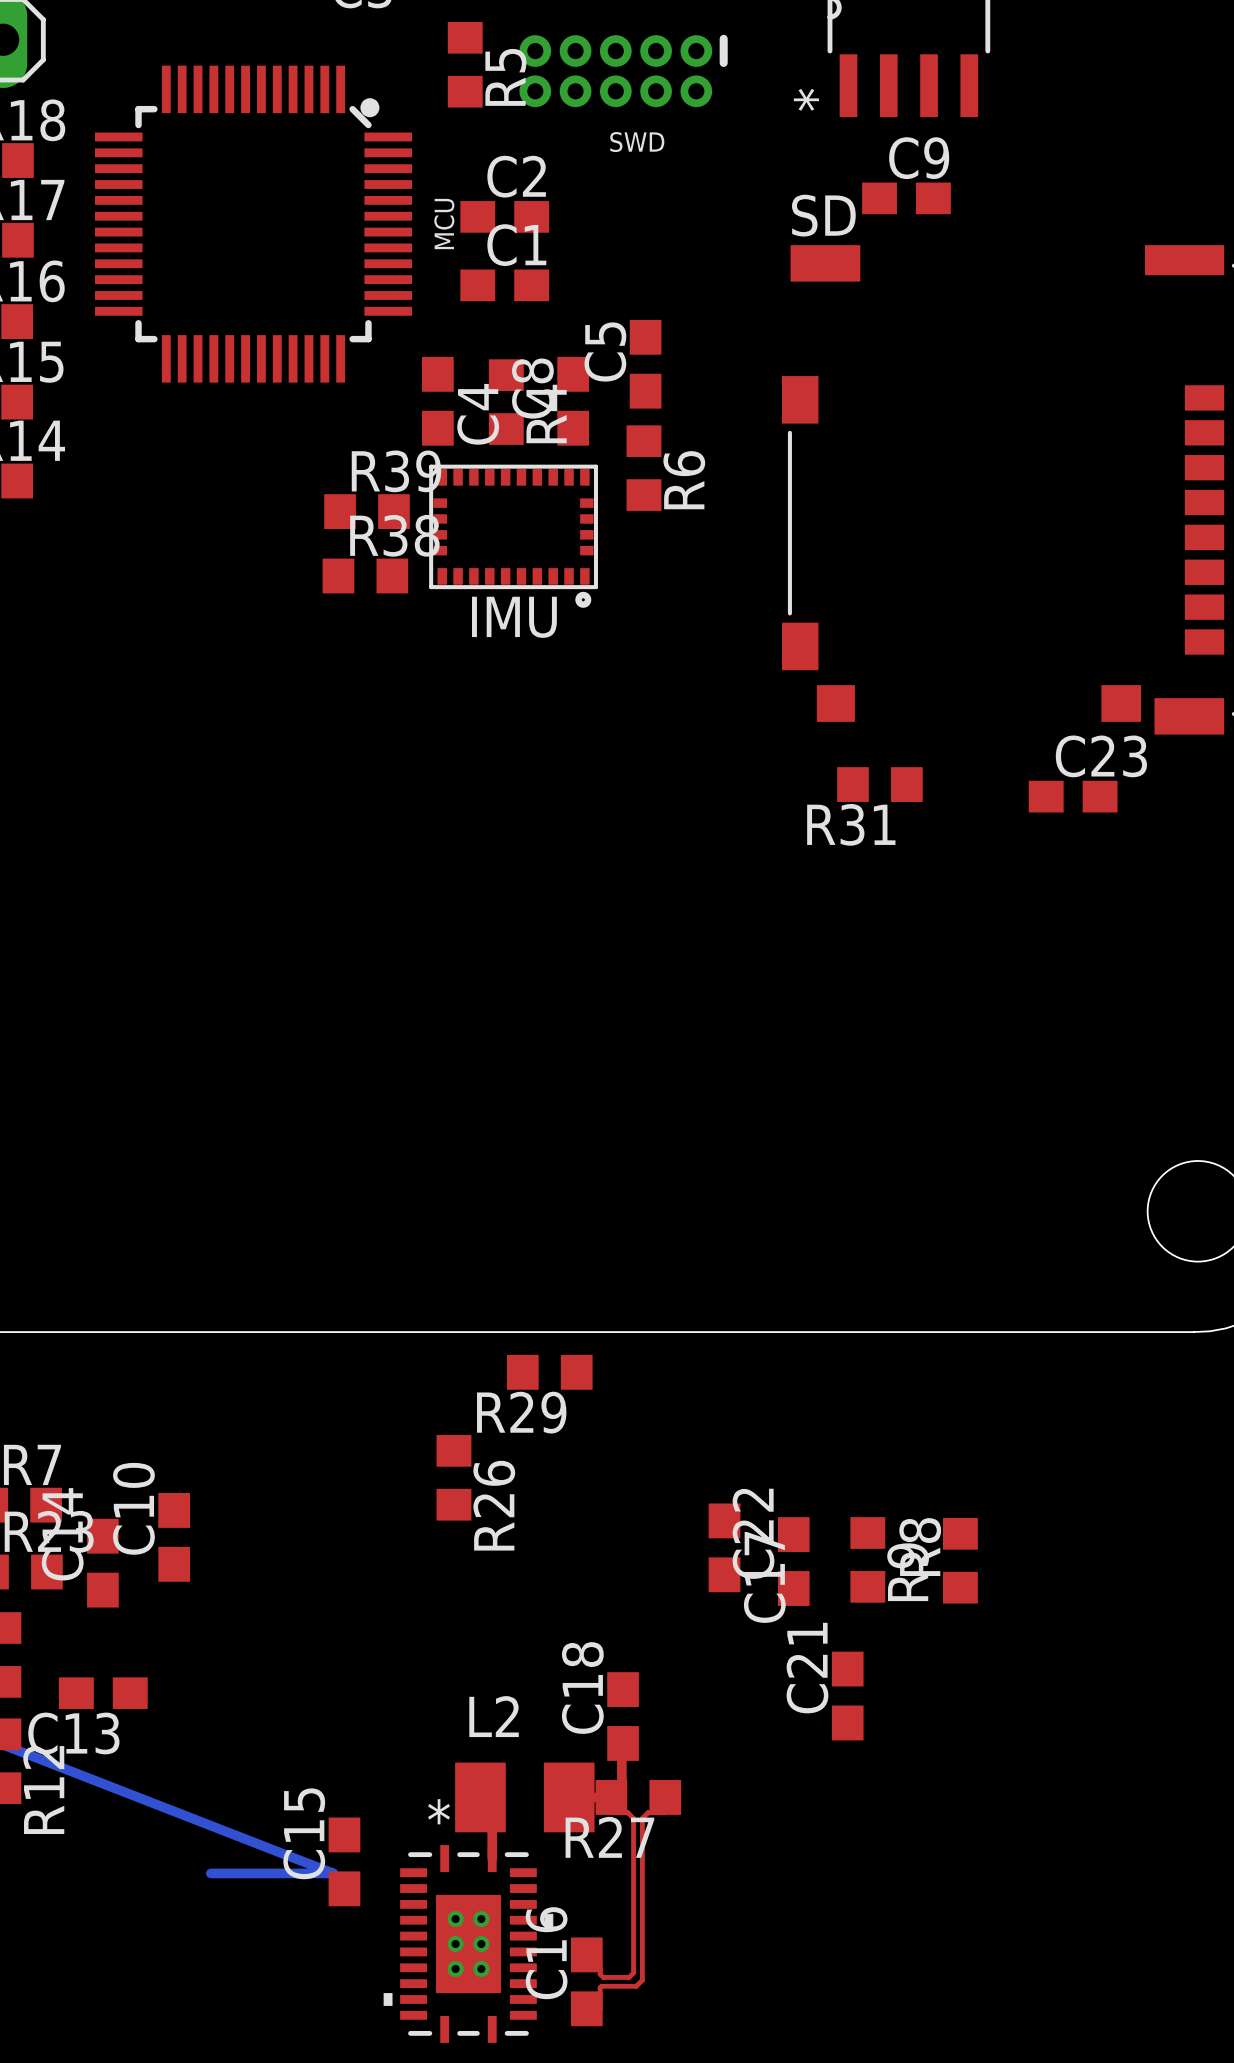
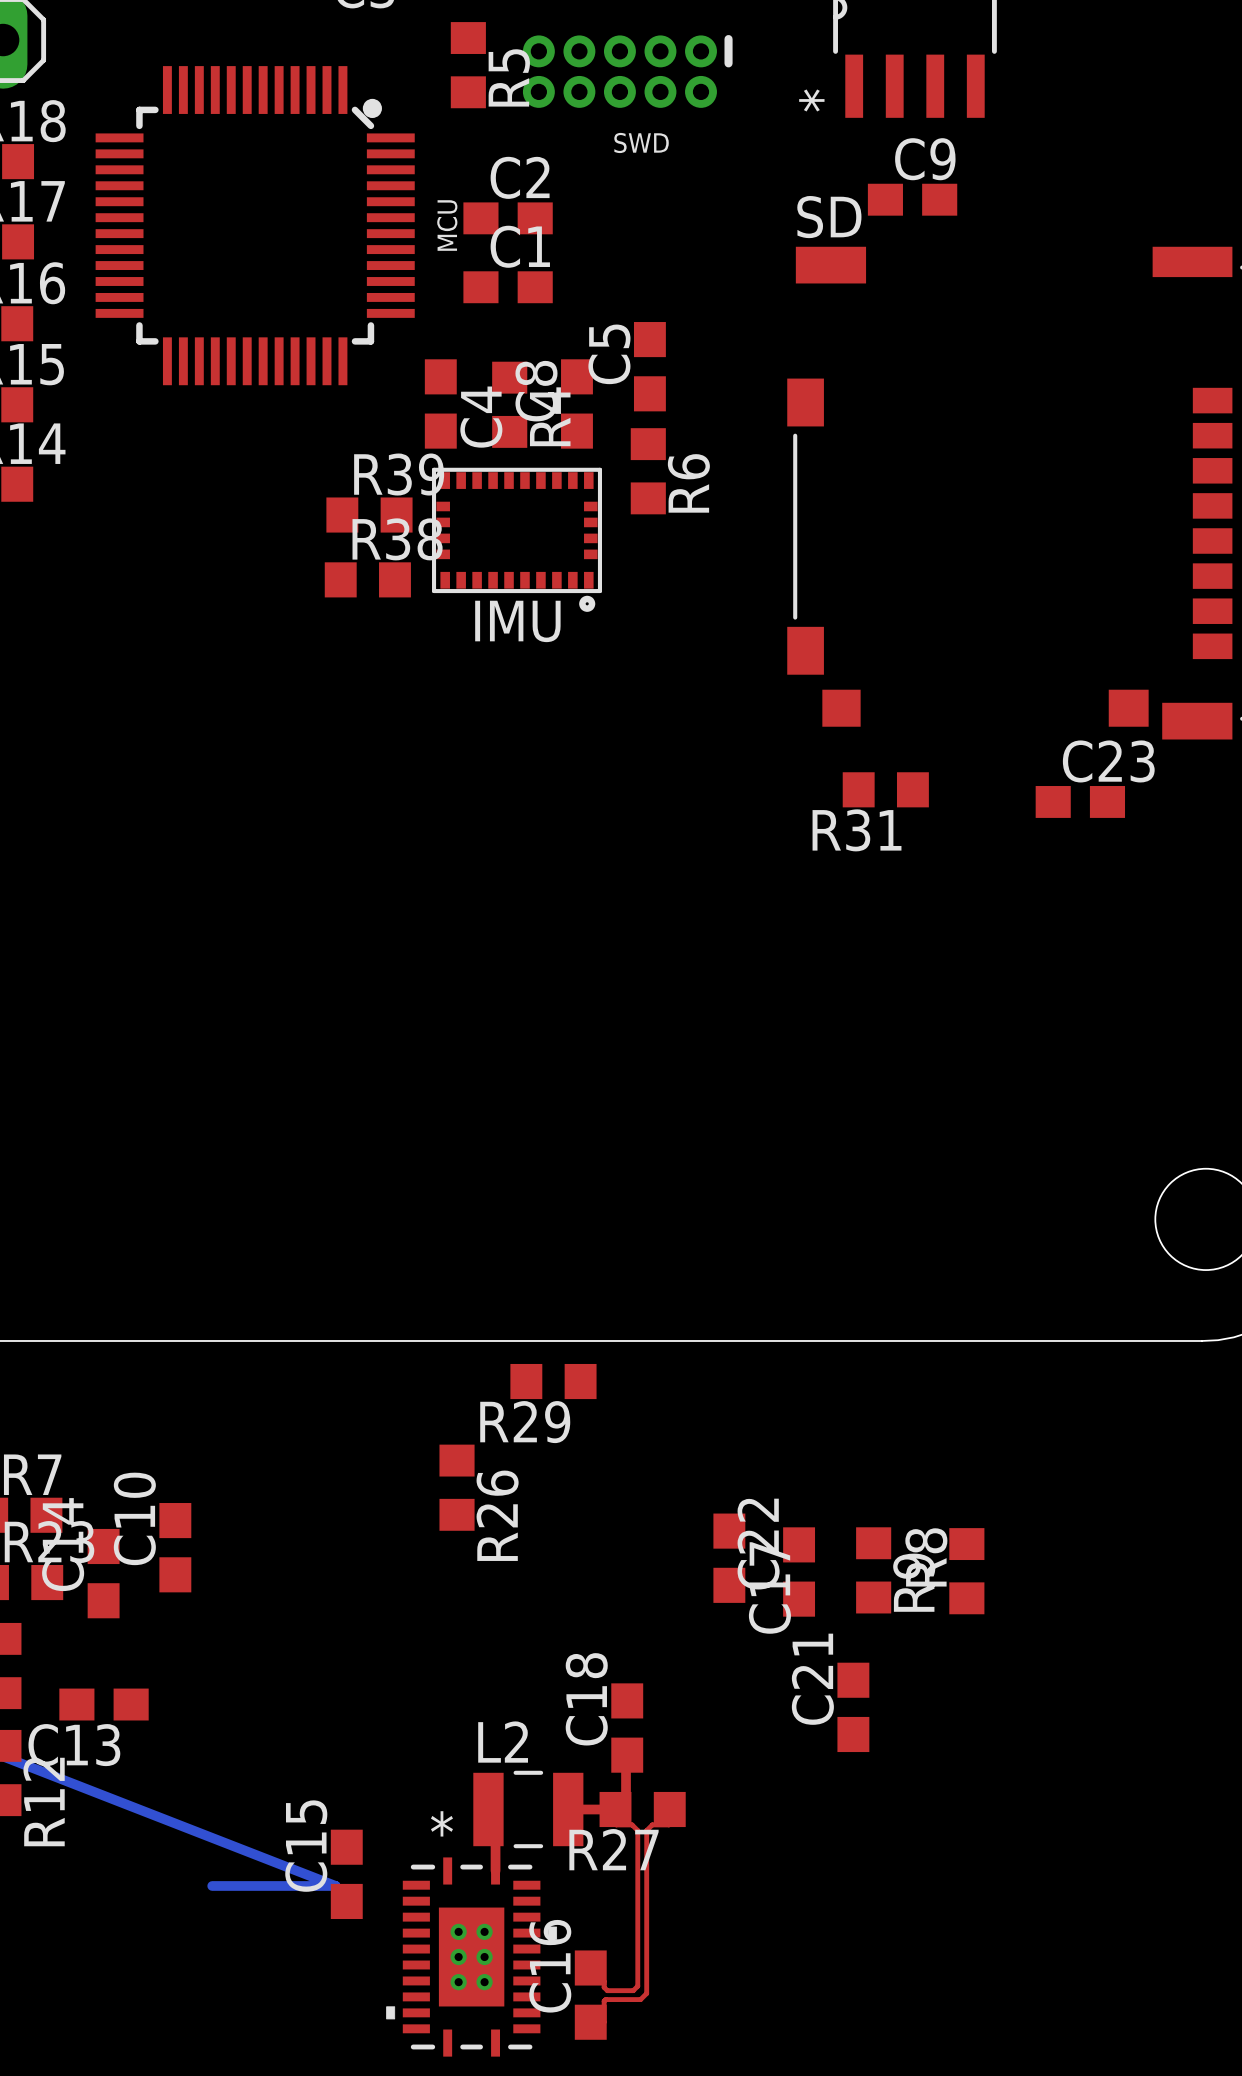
L2 footprint: [455, 1762, 595, 1833] -> [473, 1770, 584, 1849]

